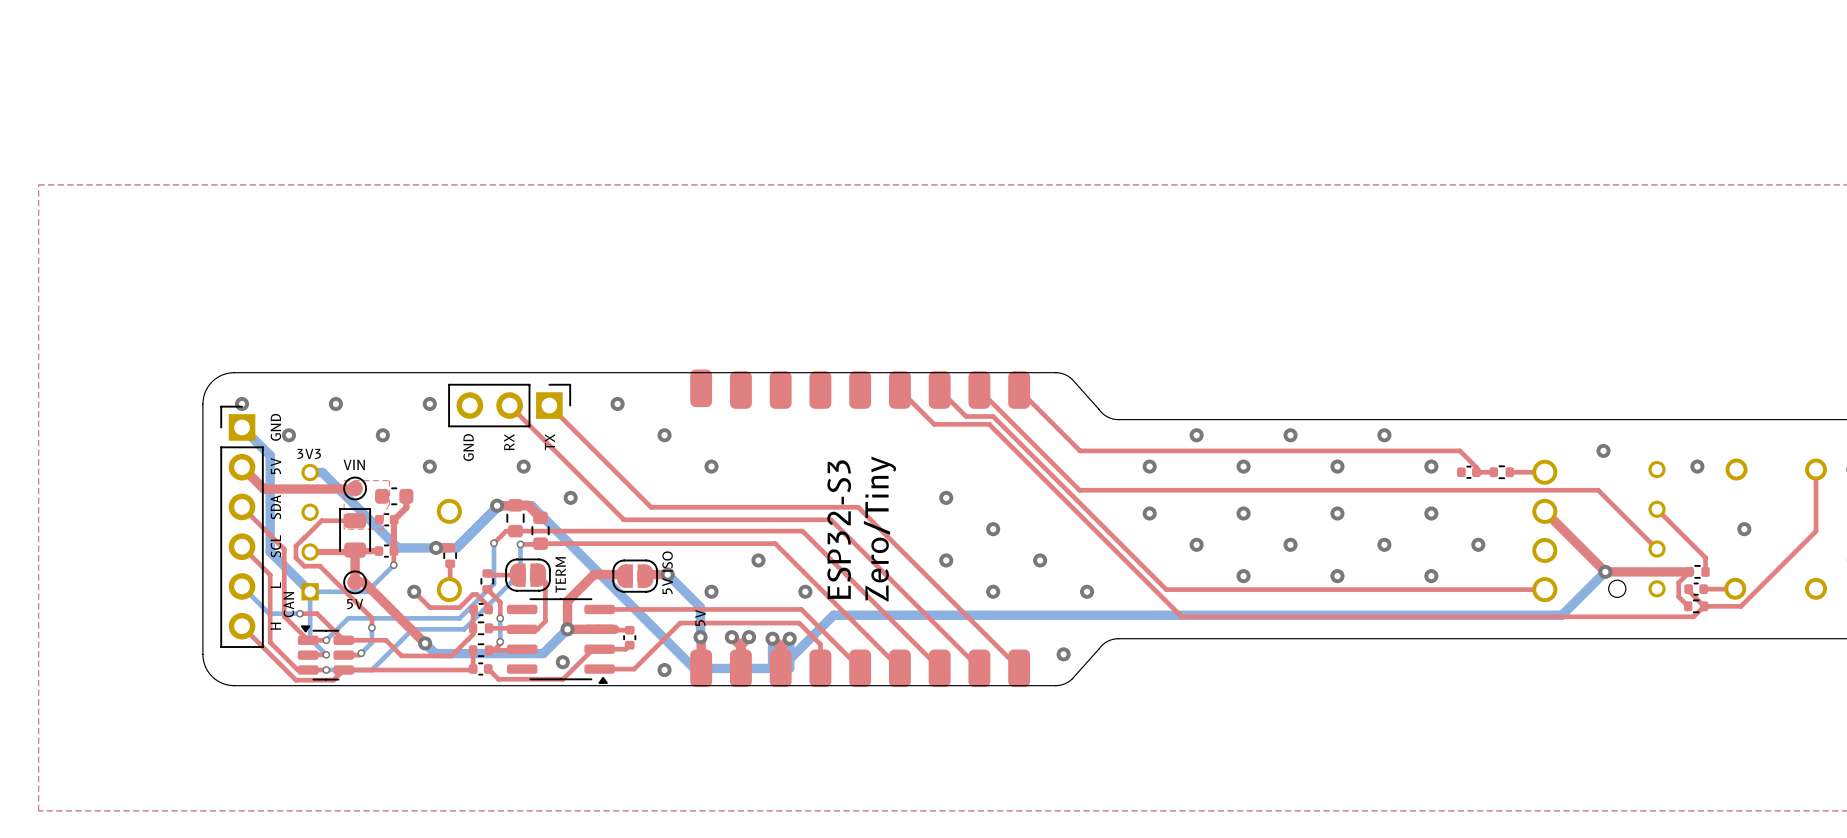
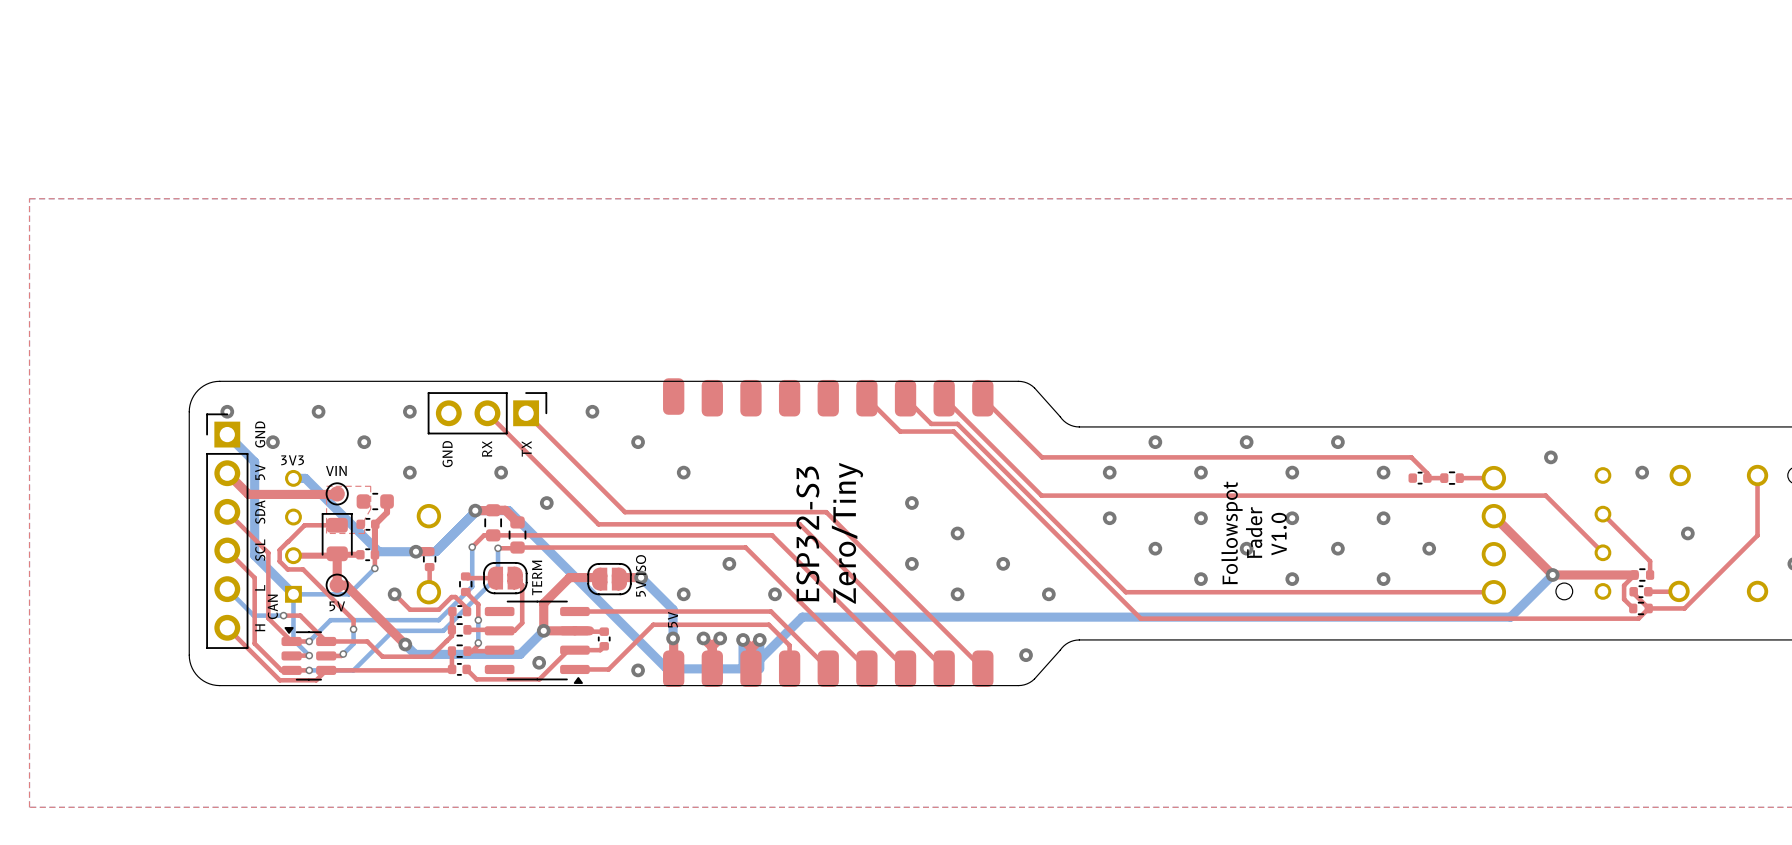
text: none -> Followspot (1232, 533)
text: none -> Fader (1254, 532)
text: none -> V1.0 (1279, 534)

